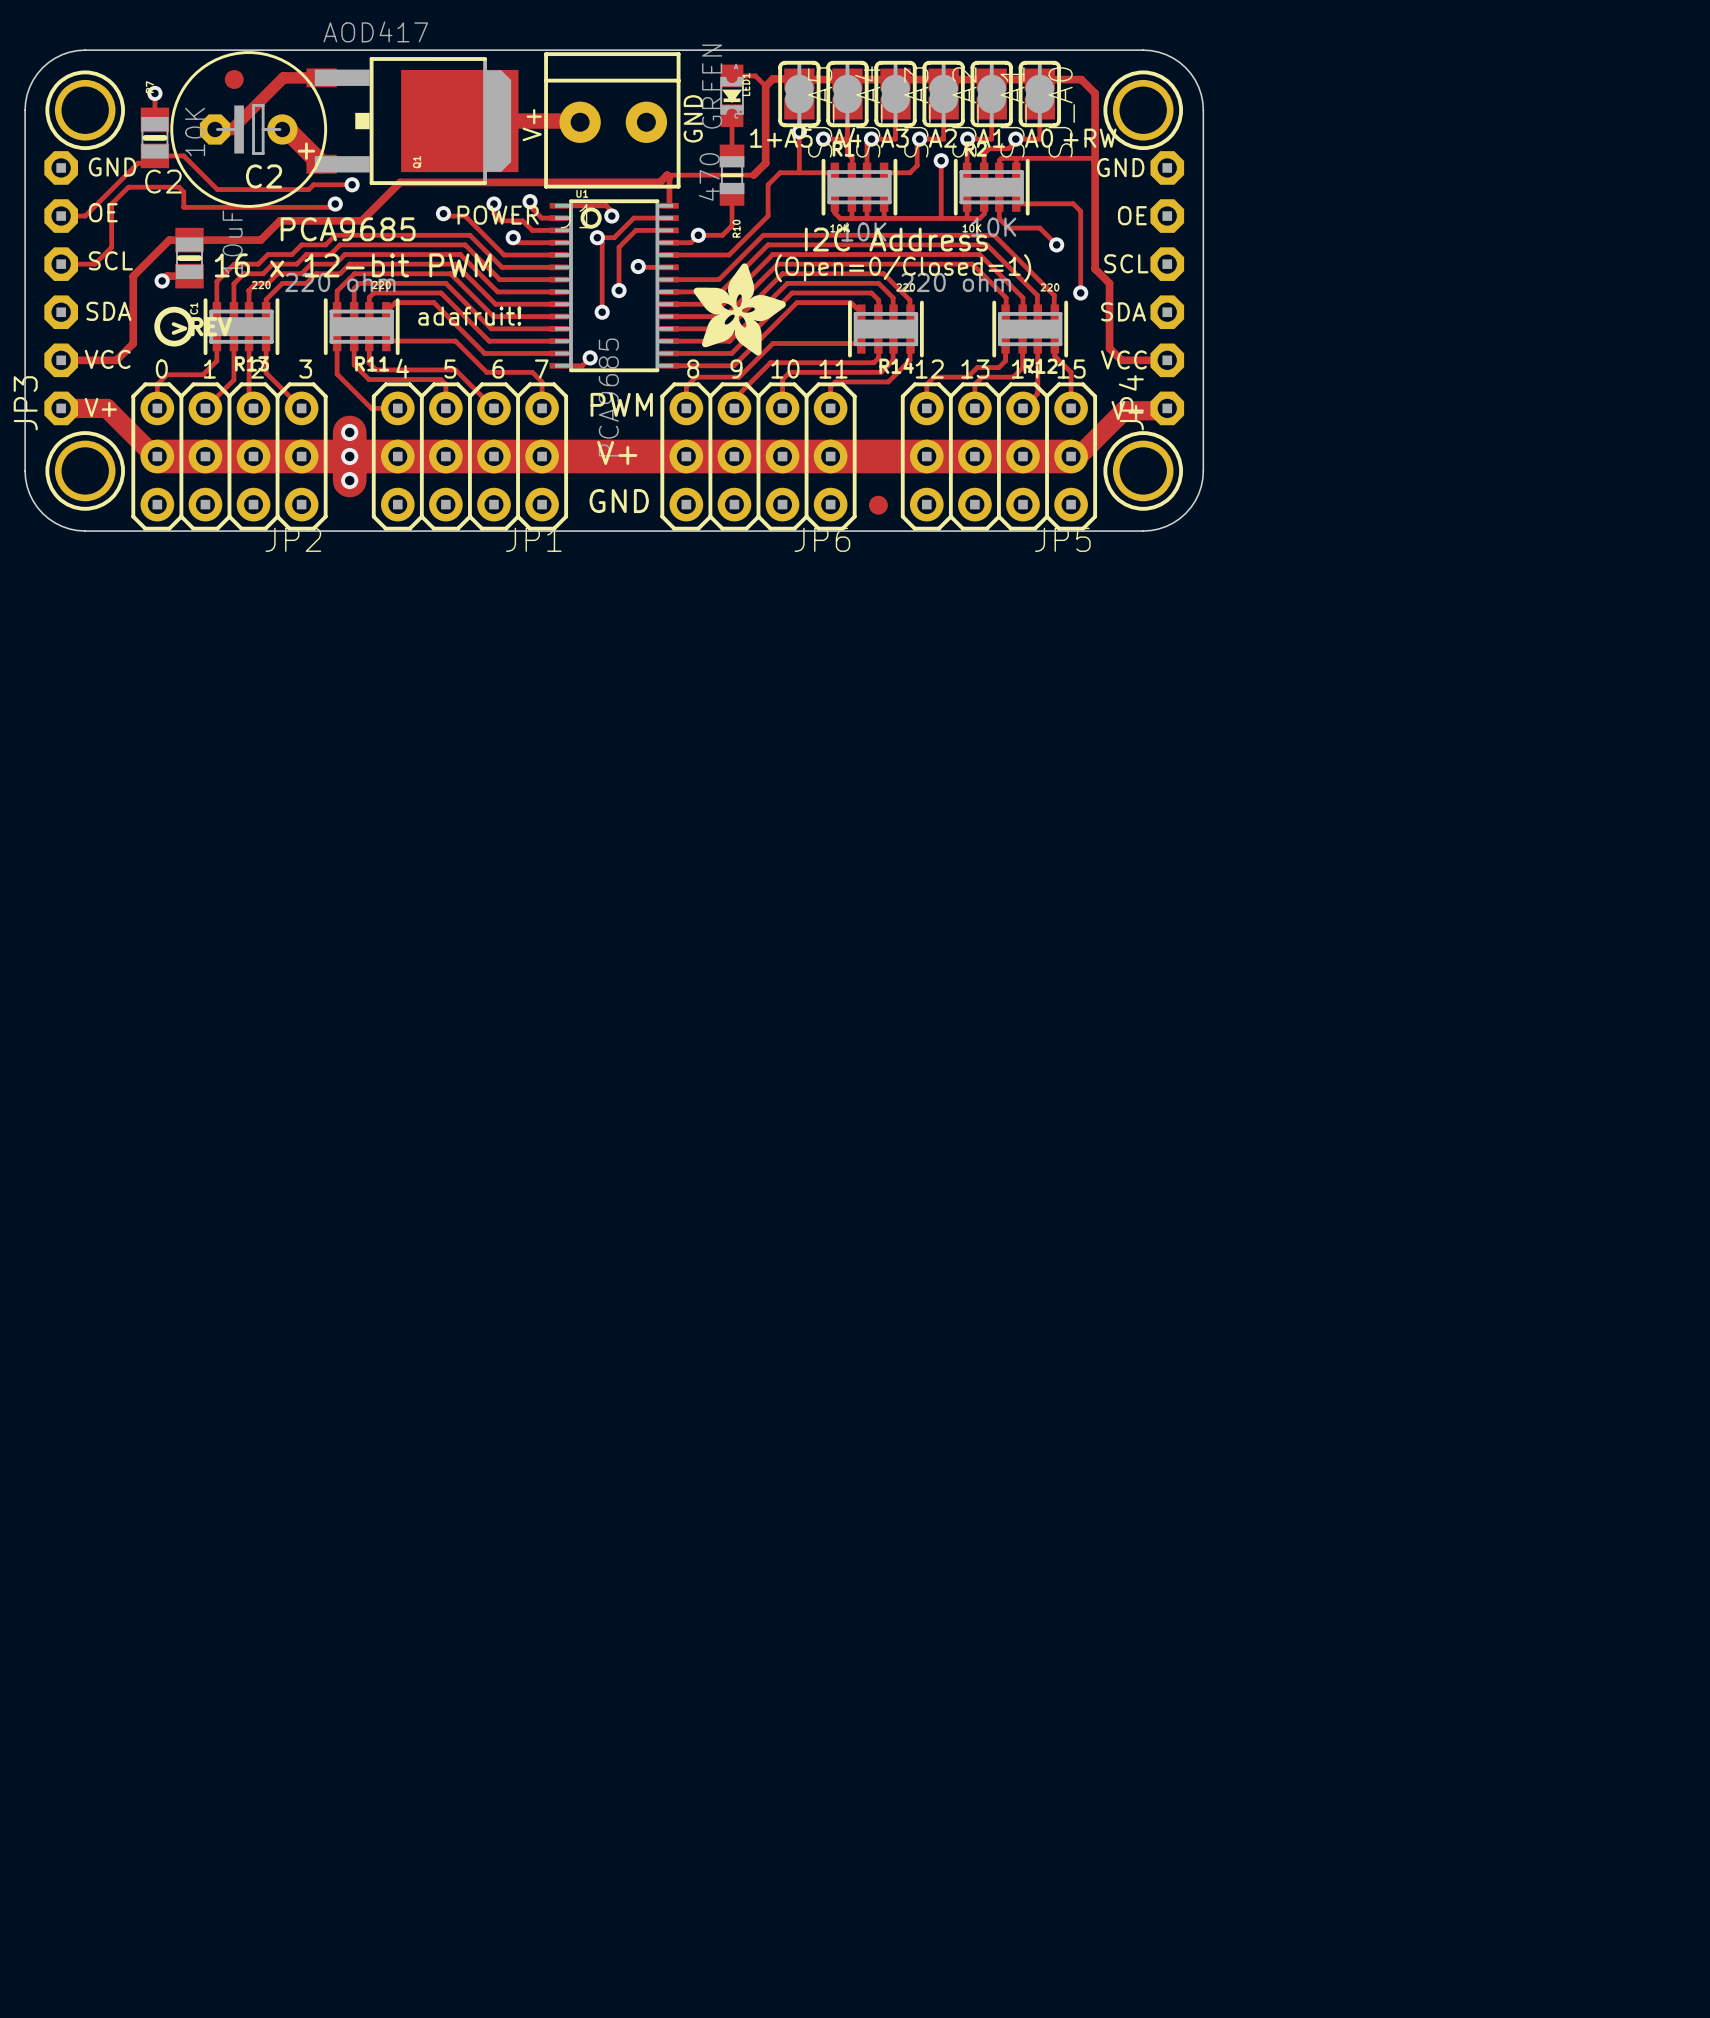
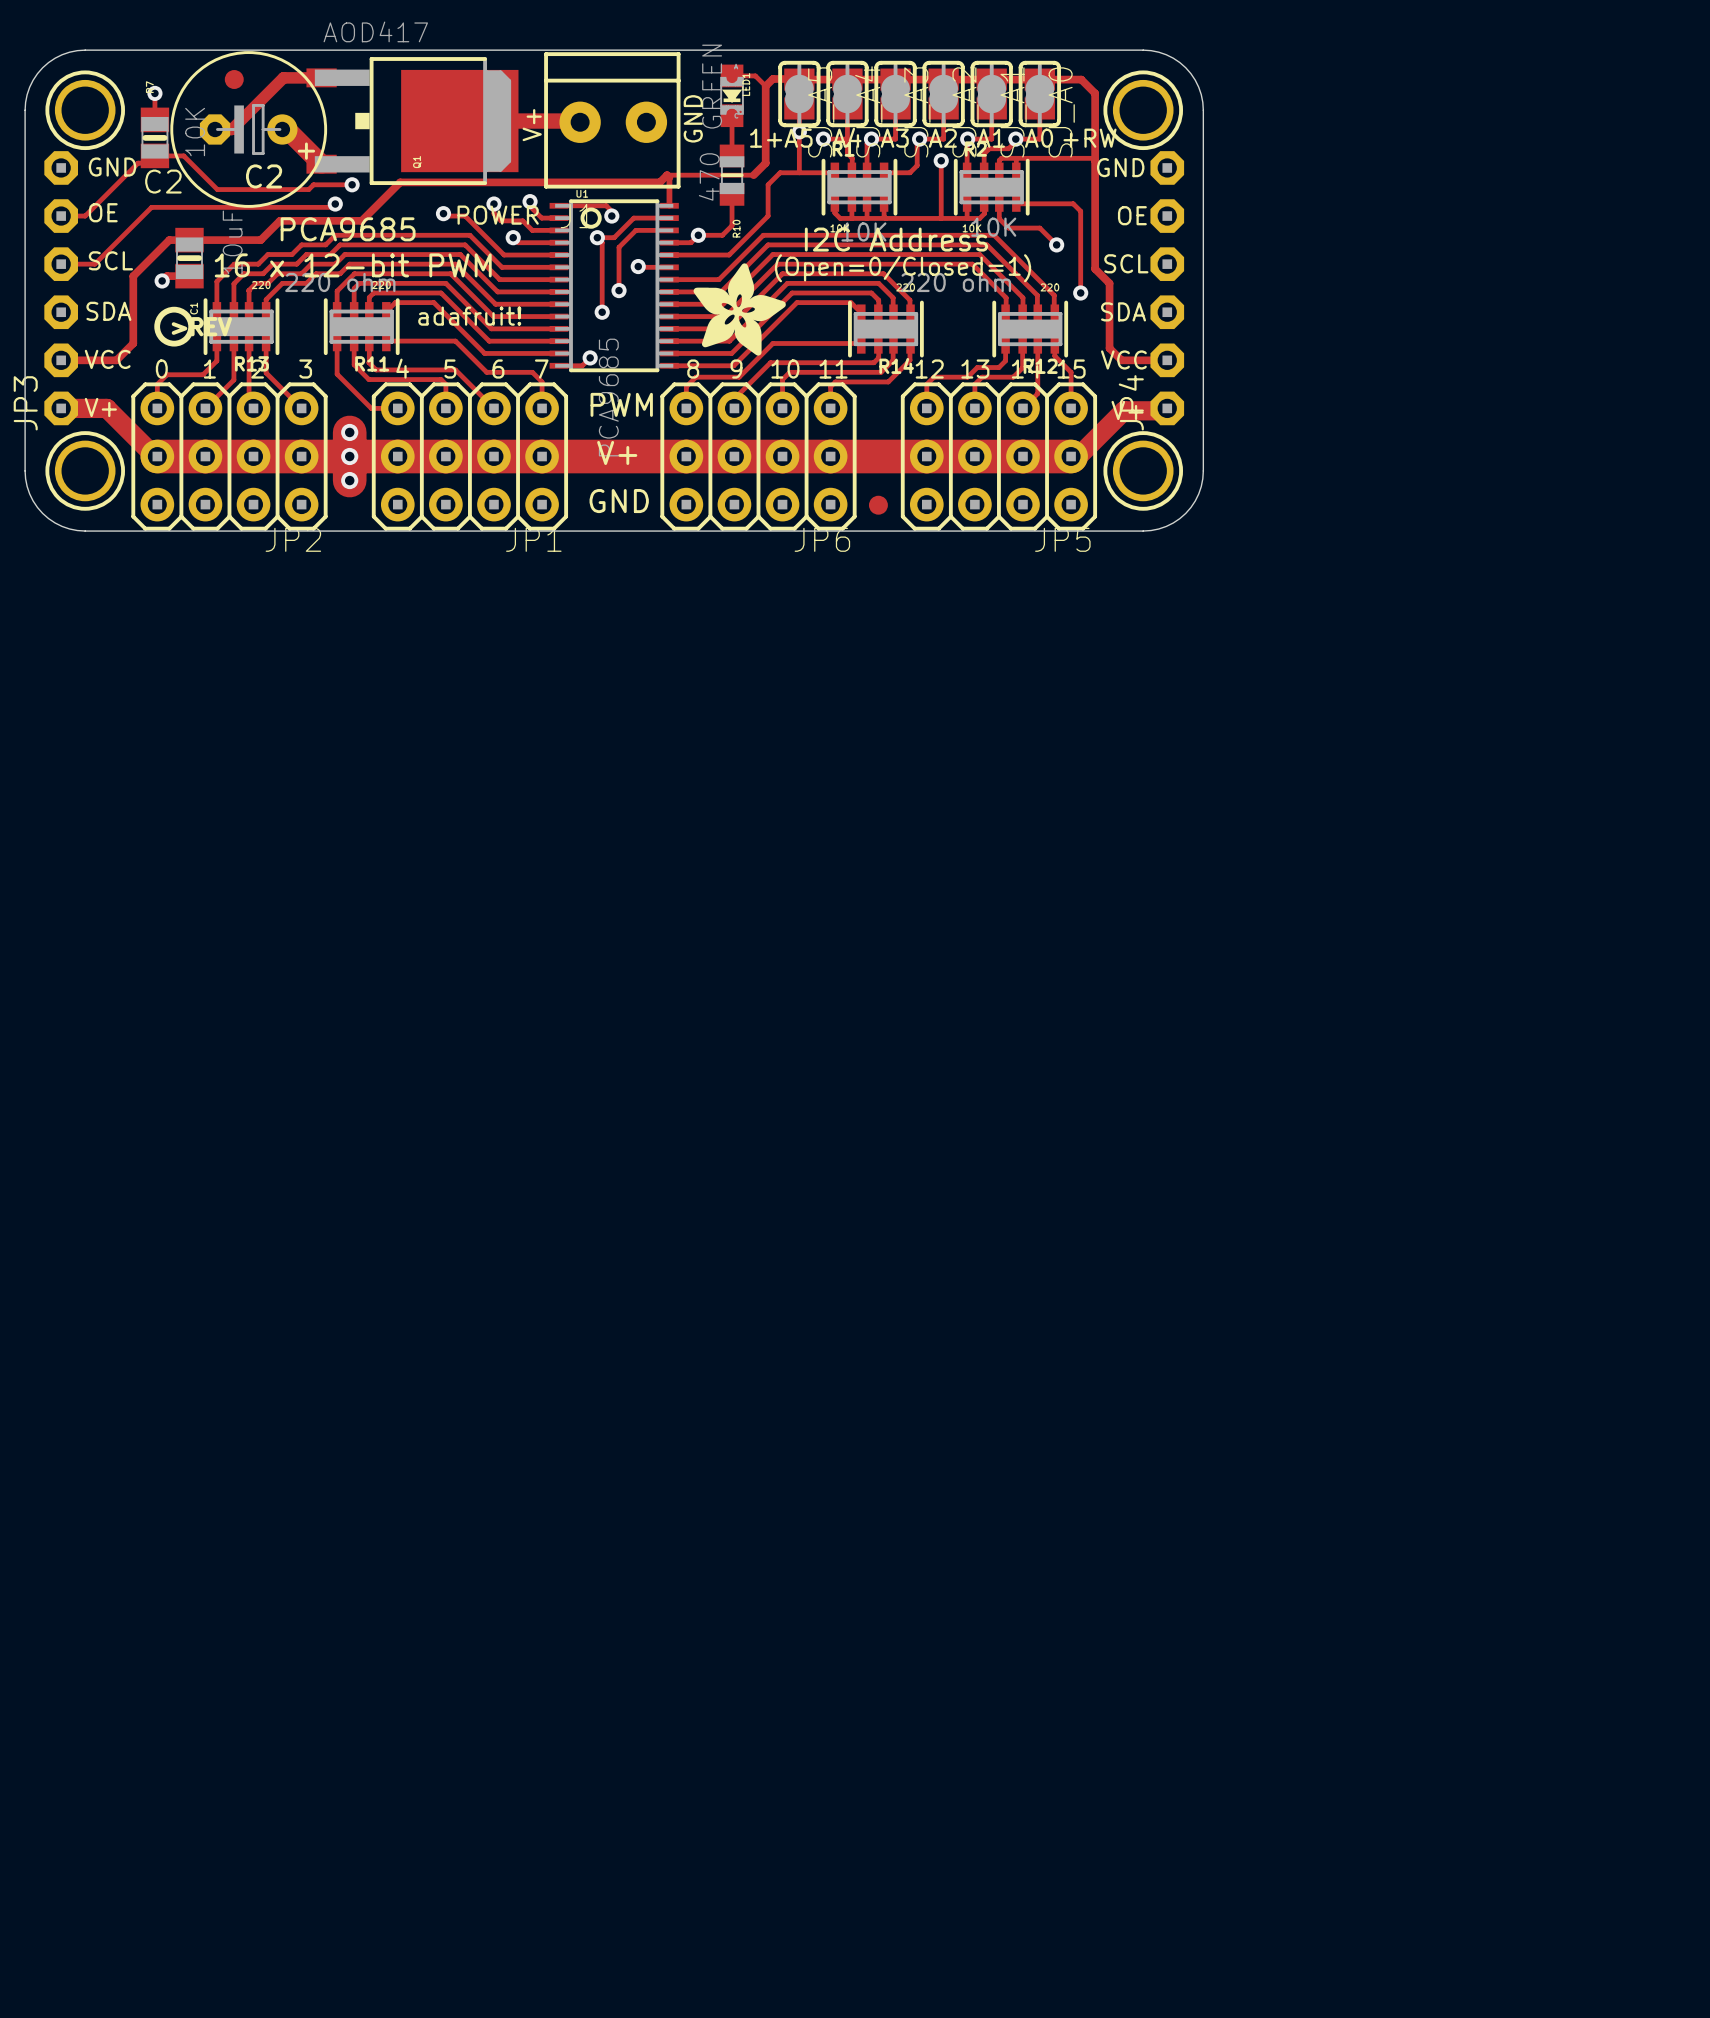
track: (183, 207) (183, 192) (178, 187) (128, 187) (111, 204) (111, 247) -> (183, 207) (151, 207) (111, 247)

